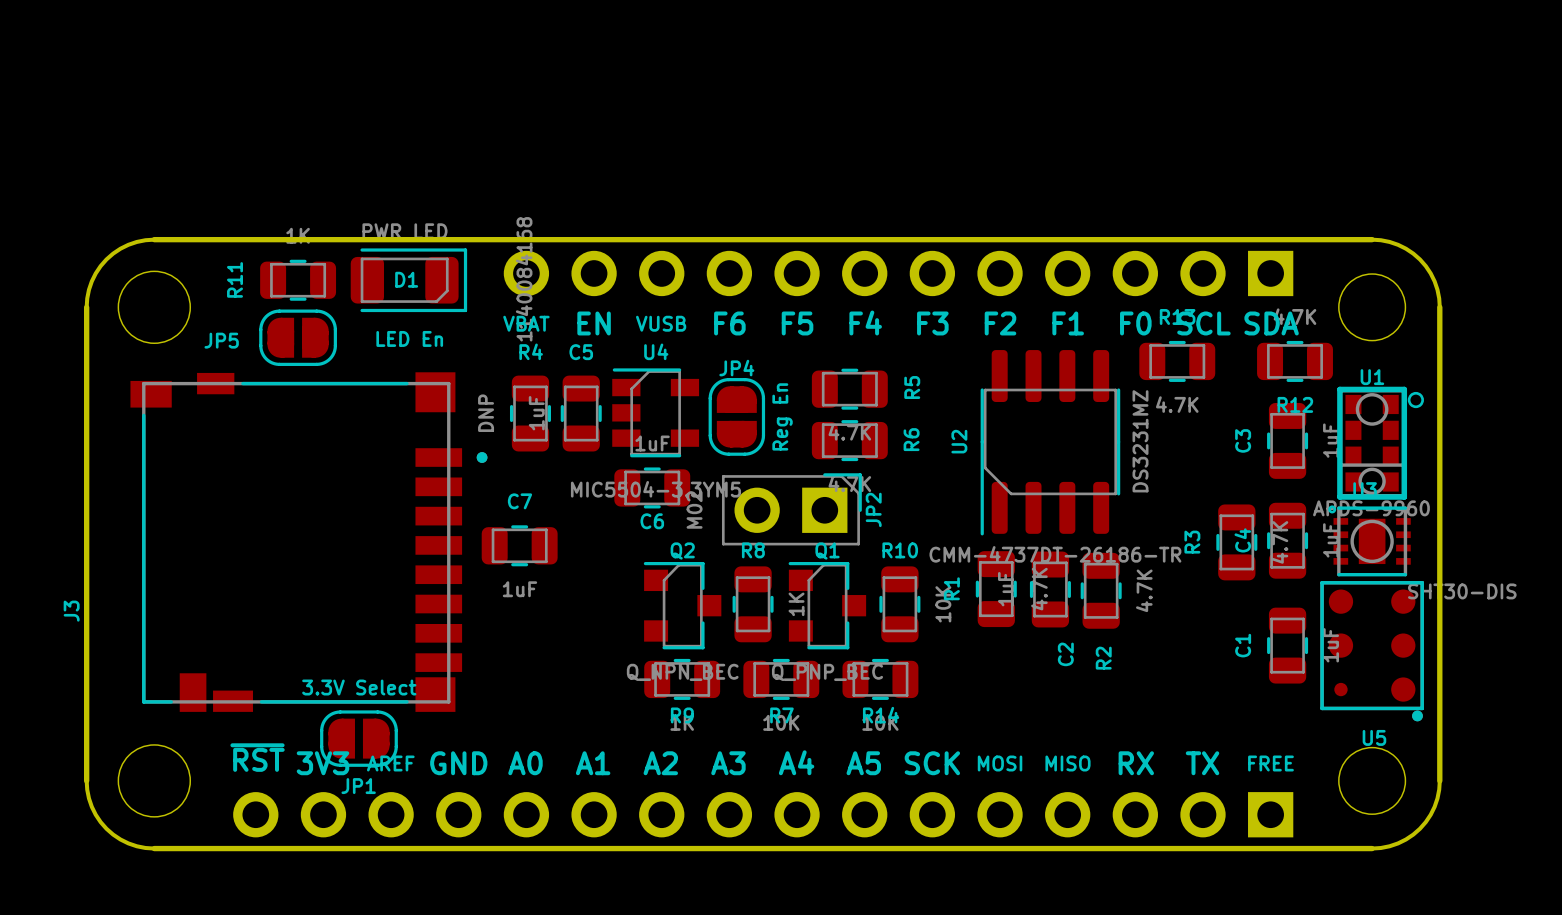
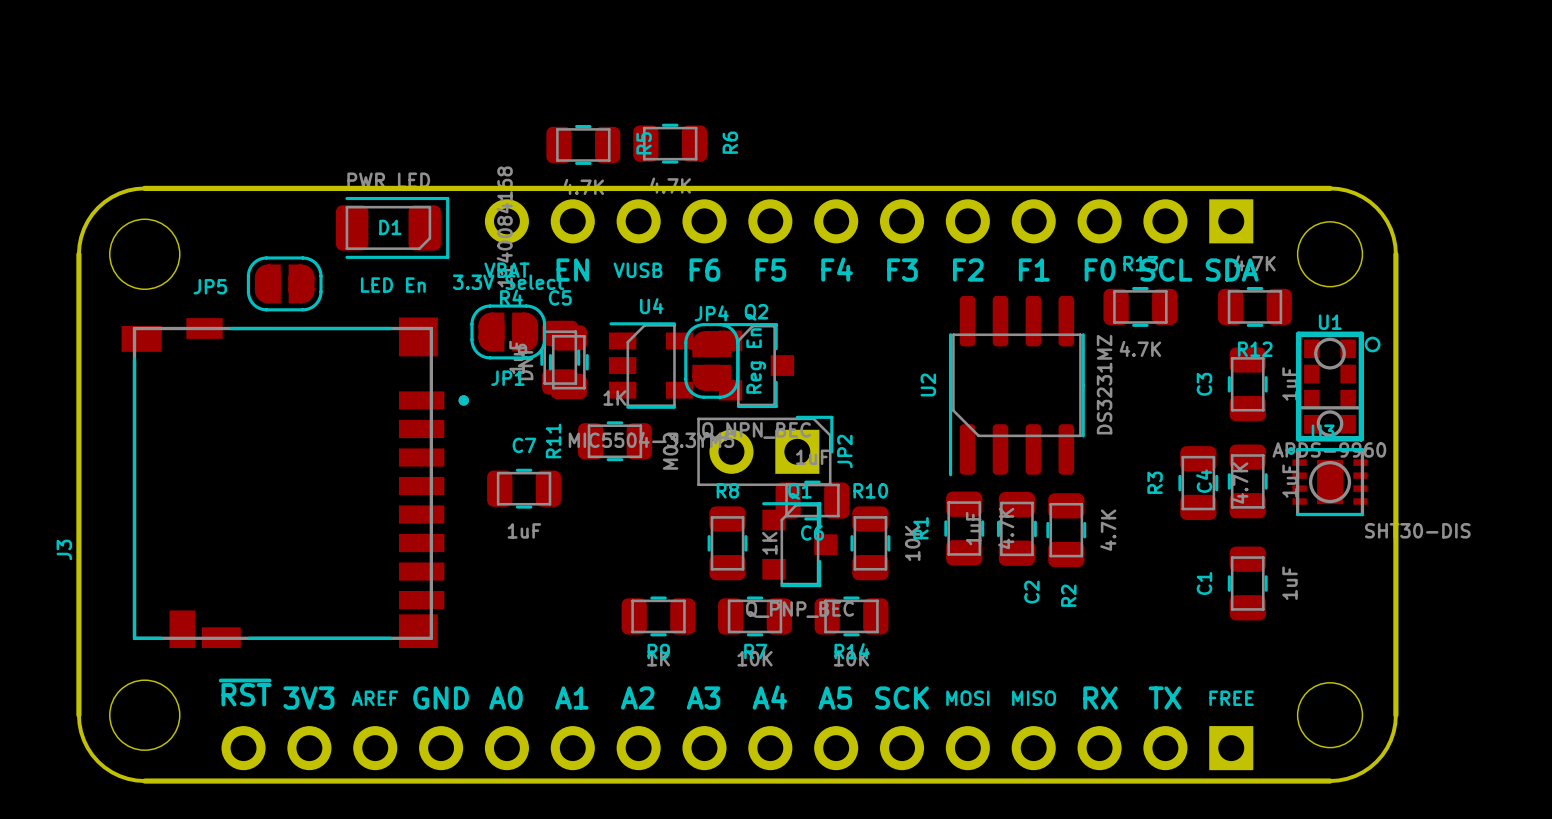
R11 position: (298, 280) -> (614, 441)
R5 position: (849, 389) -> (583, 144)
U4 position: (655, 412) -> (651, 365)
R4 position: (530, 413) -> (568, 362)
R6 position: (849, 440) -> (670, 143)
C6 position: (652, 487) -> (812, 500)
C7 position: (519, 545) -> (524, 488)
Q2 position: (682, 605) -> (756, 365)
U5: CMM-4737DT-26186-TR (1372, 651) -> none
JP1 position: (358, 738) -> (508, 331)

